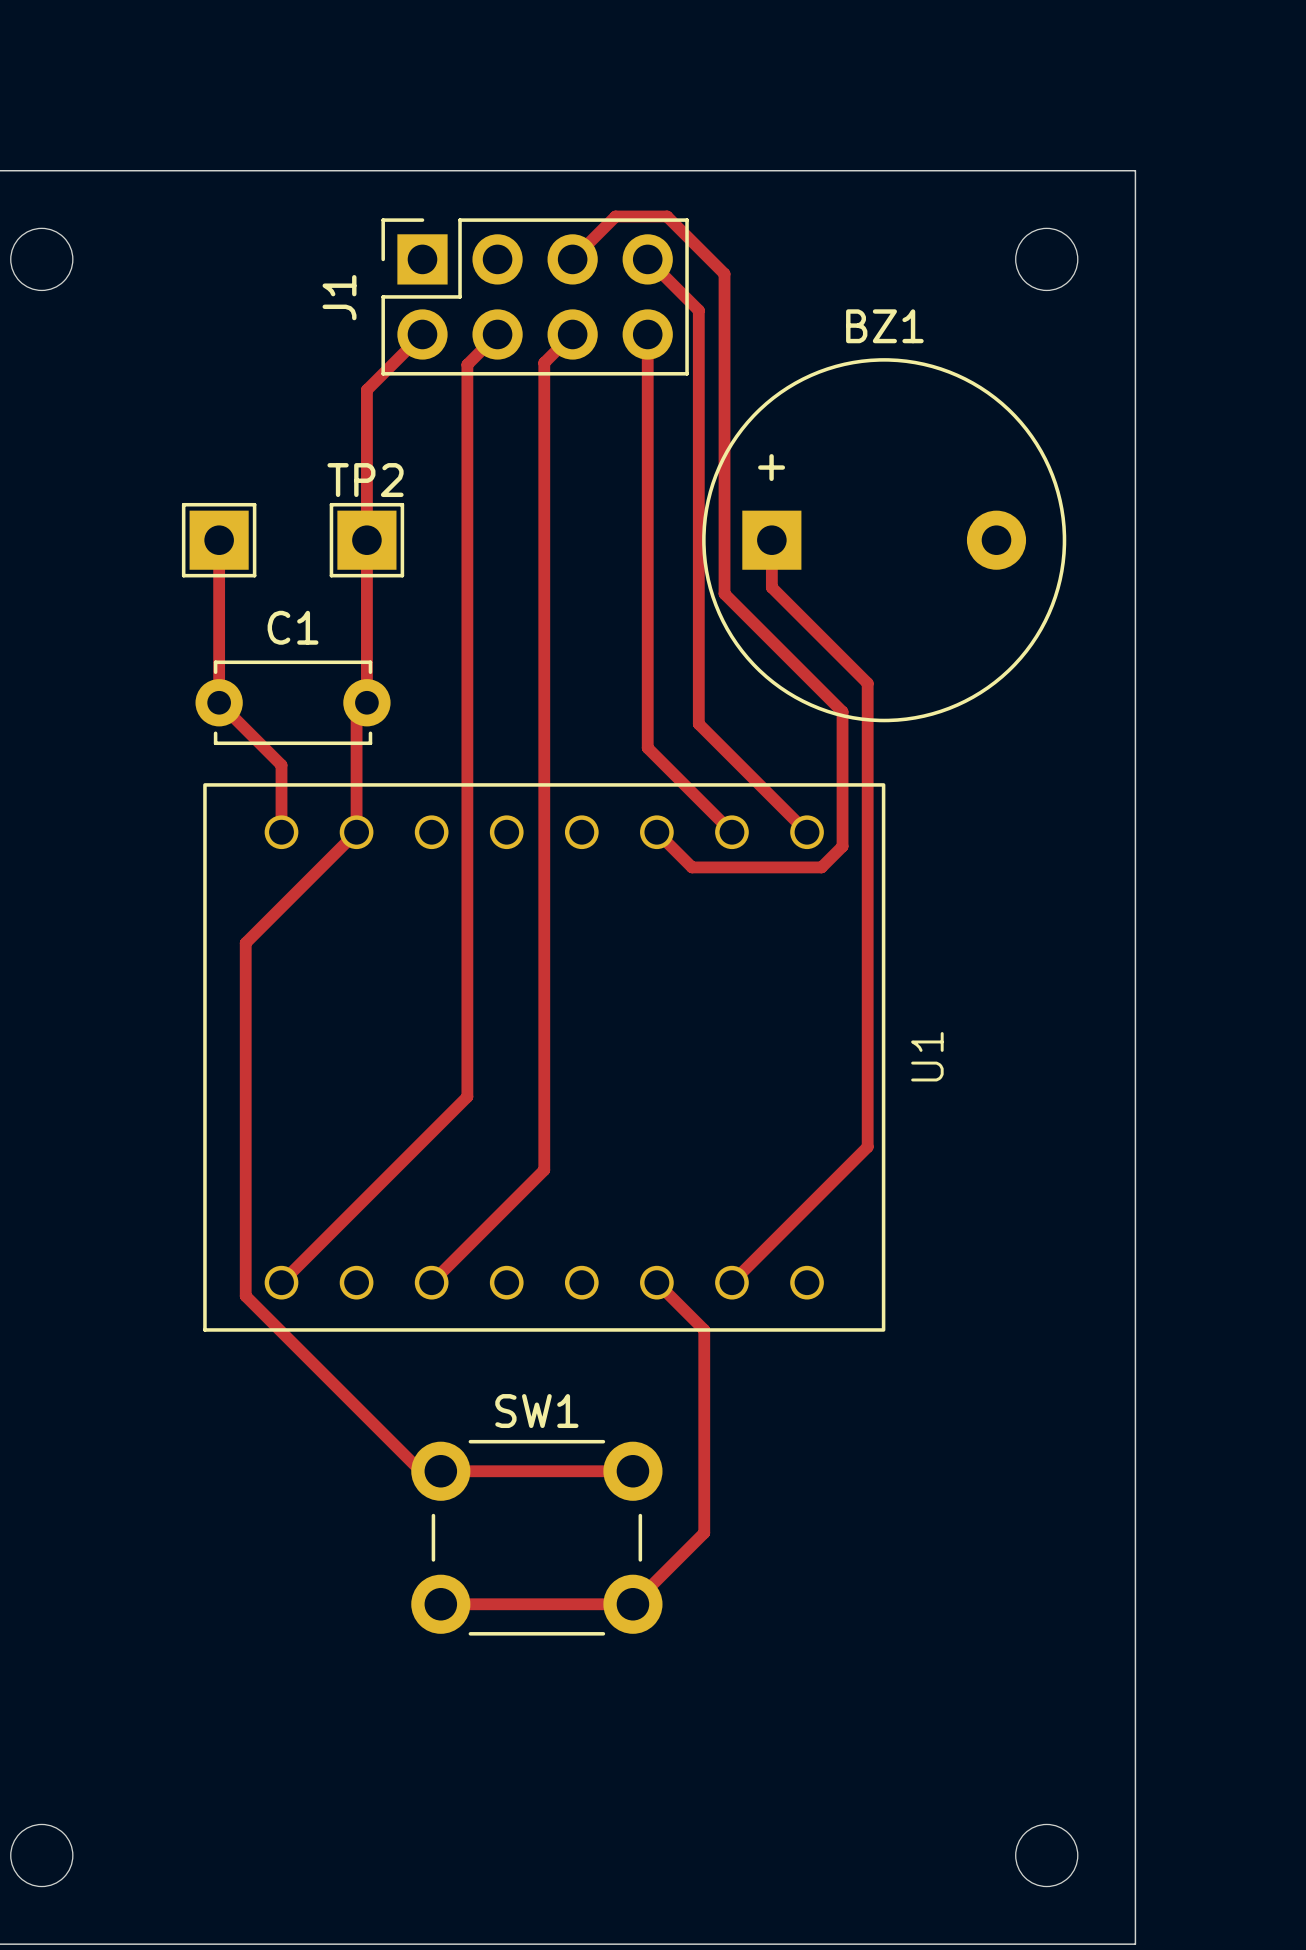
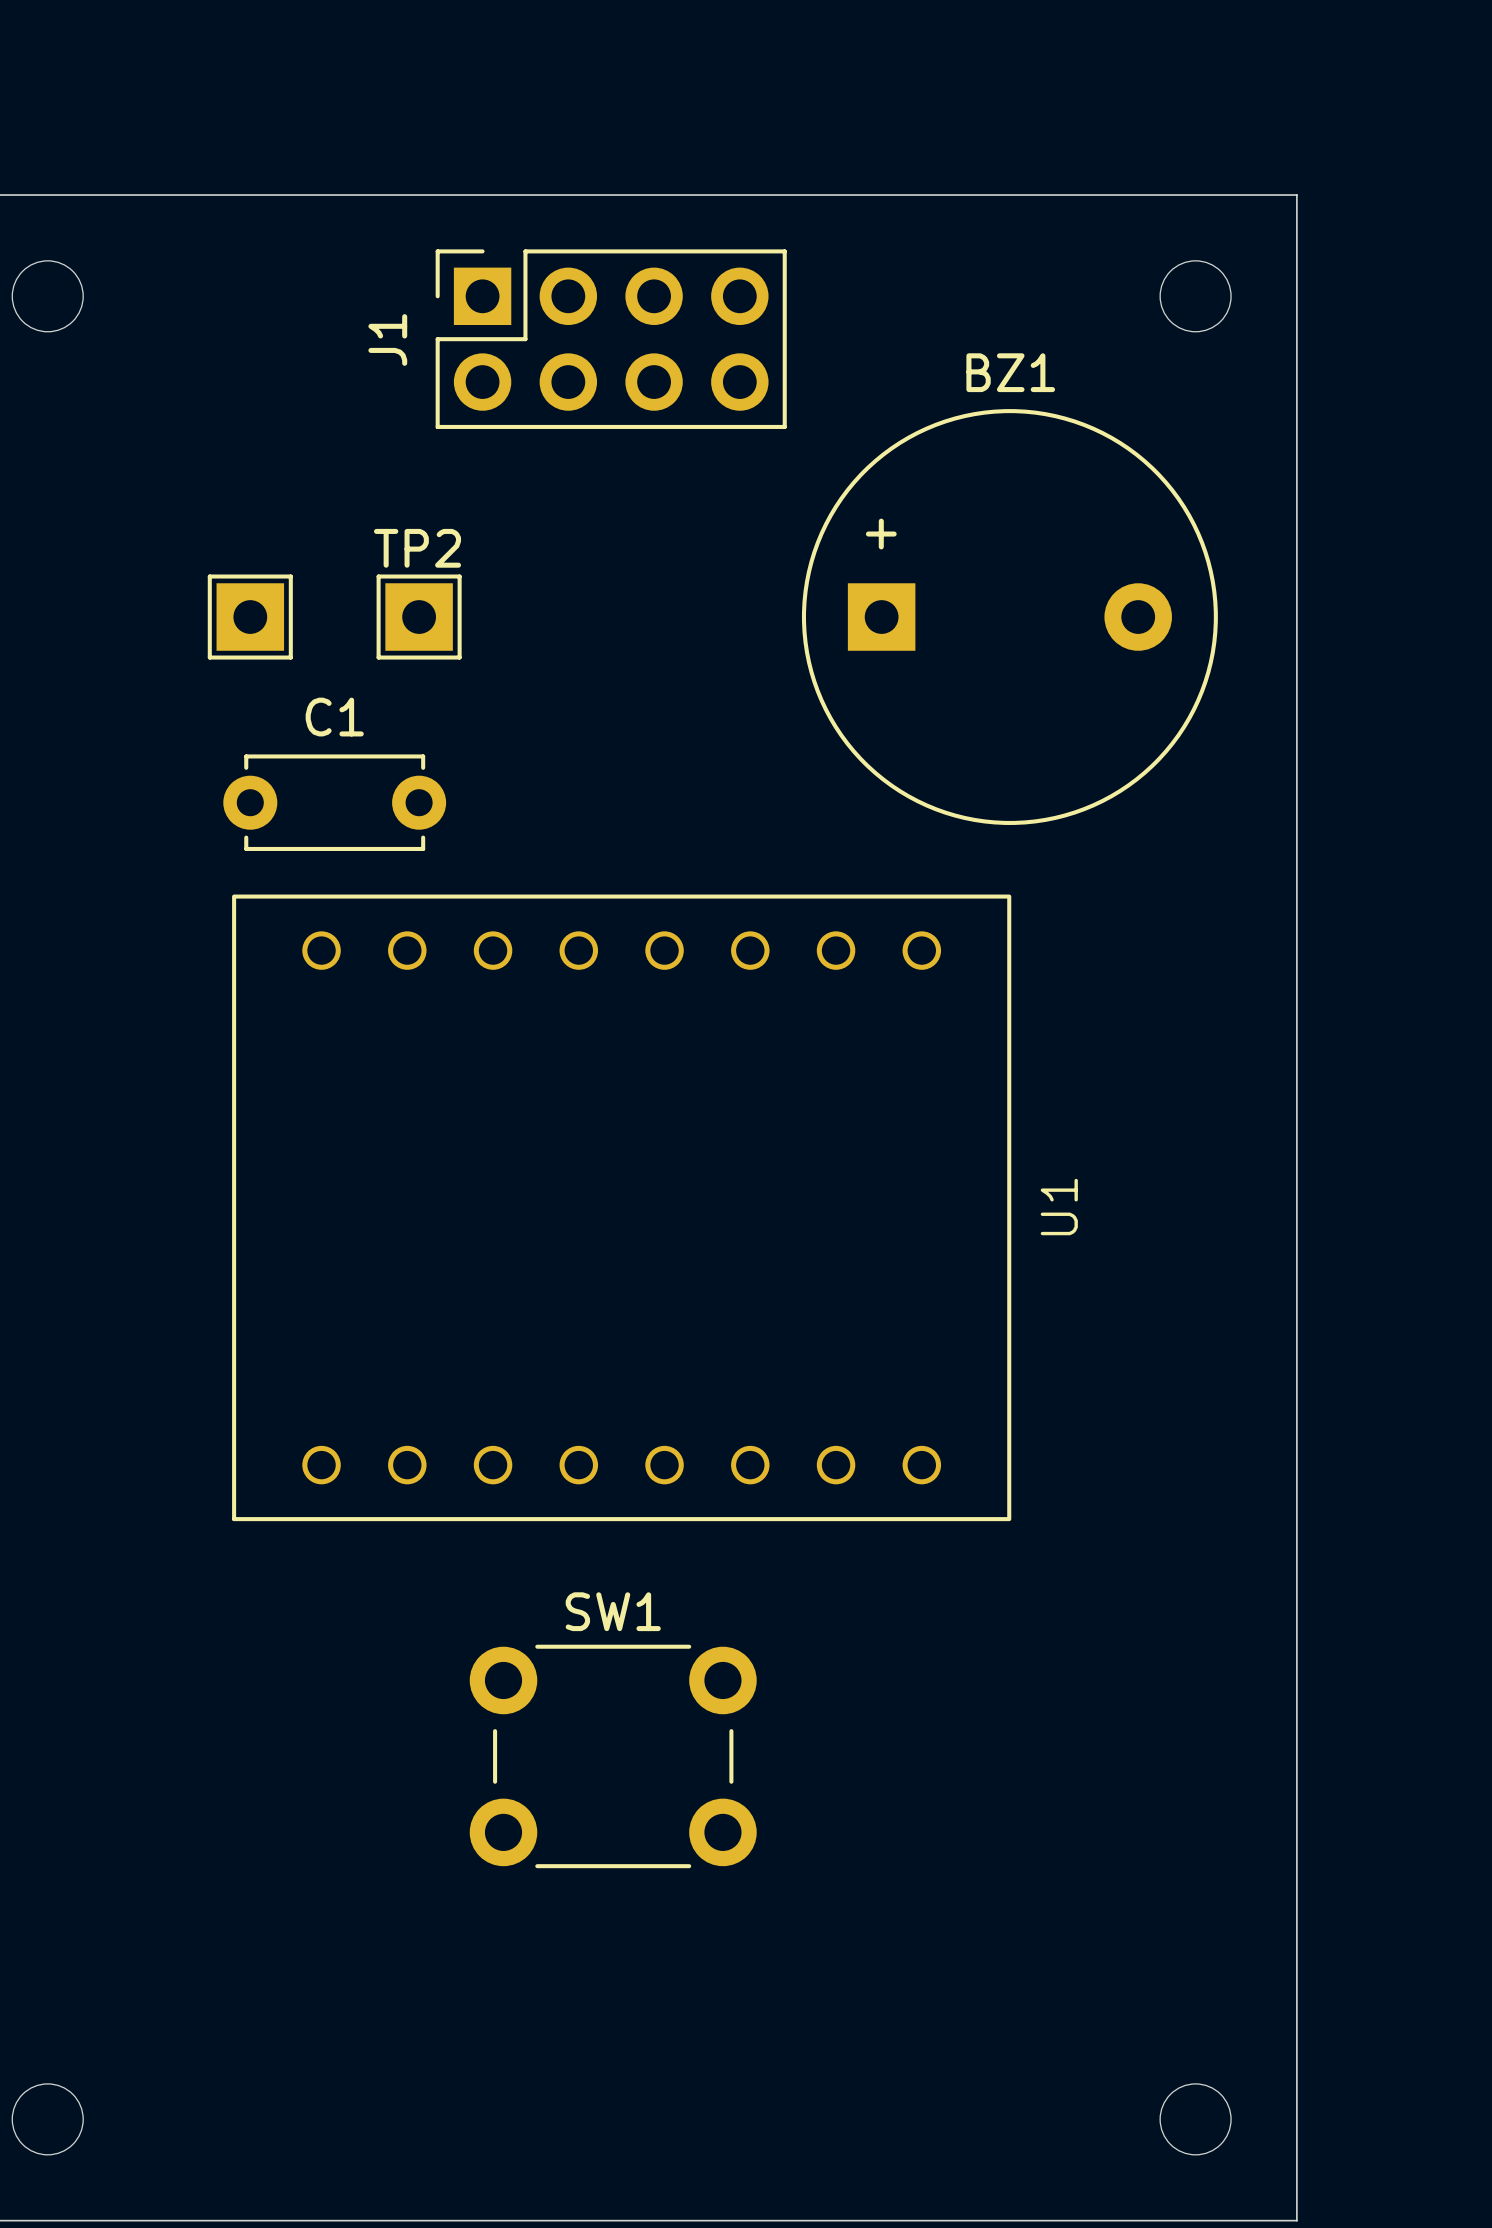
top track: (572, 259) (615, 216) (667, 216) (724, 273) (724, 593) (842, 711) (842, 846) (821, 867) (692, 867) (656, 832) -> none
top track: (647, 259) (698, 310) (698, 724) (807, 832) -> none
top track: (422, 334) (366, 390) (366, 702) -> none
top track: (497, 334) (467, 364) (467, 1096) (281, 1282) -> none
top track: (572, 334) (544, 362) (544, 1170) (431, 1282) -> none
top track: (647, 334) (647, 747) (731, 832) -> none
top track: (219, 540) (219, 702) (281, 765) (281, 832) -> none
top track: (771, 540) (771, 587) (867, 683) (867, 1146) (731, 1282) -> none
top track: (356, 713) (356, 832) (245, 943) (245, 1296) (420, 1471) -> none
top track: (656, 1282) (704, 1330) (704, 1532) (632, 1604) (440, 1604) -> none
top track: (440, 1471) (632, 1471) -> none

